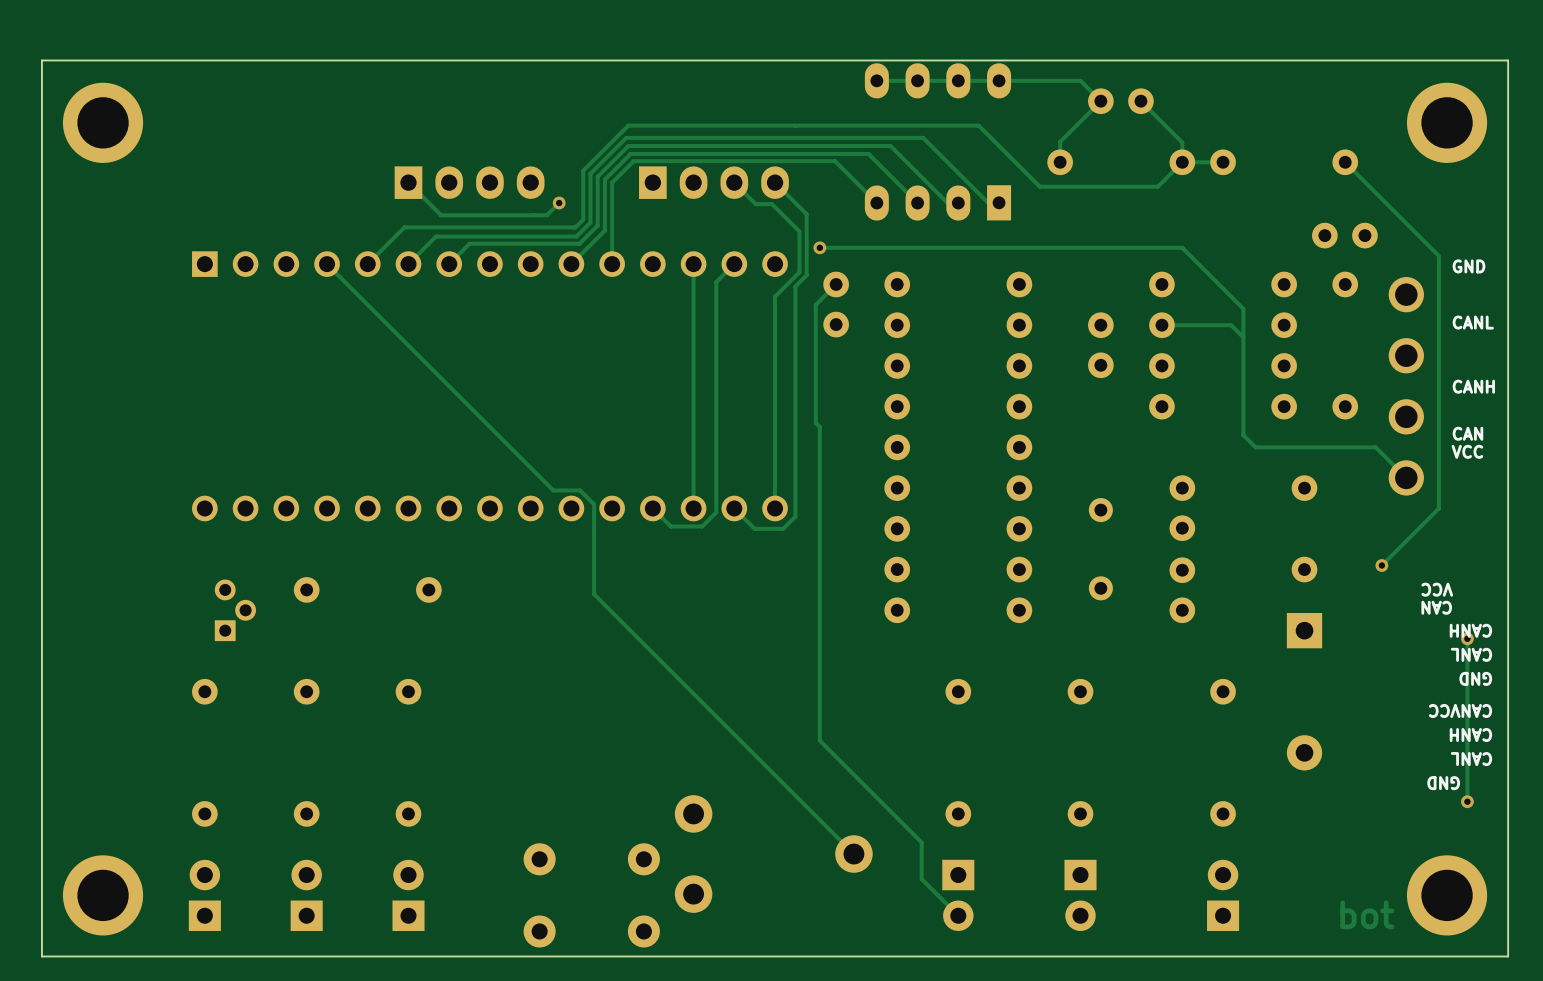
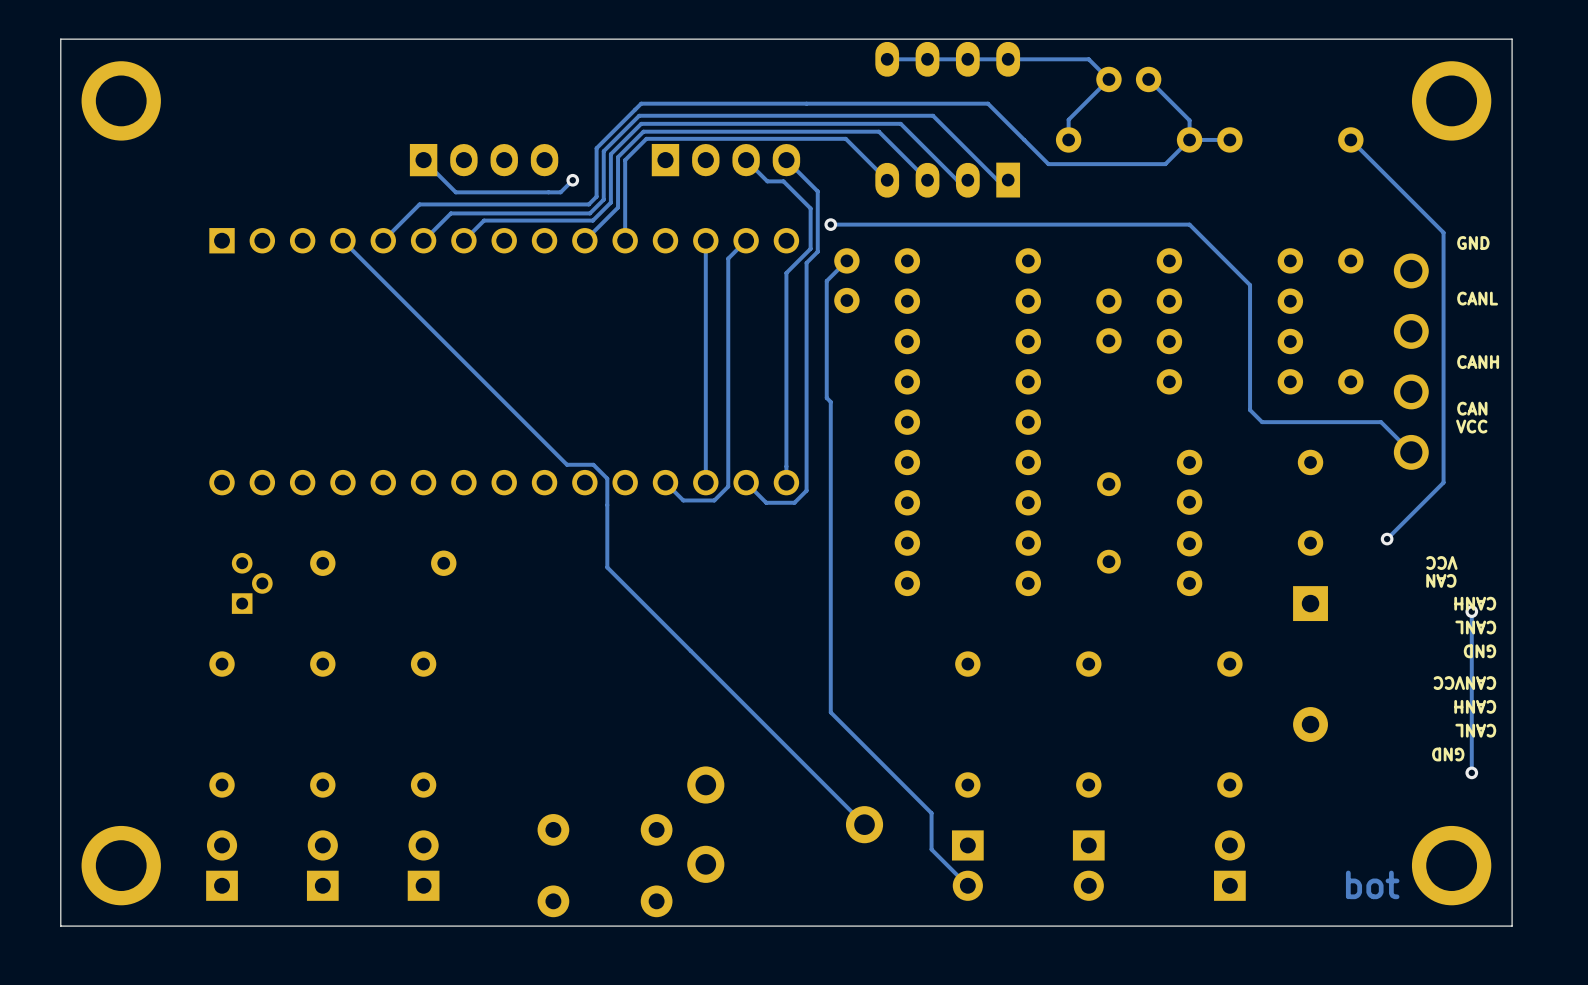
part: (1344, 235) -> none
track: (1161, 325) (1231, 325) (1243, 337) -> none

